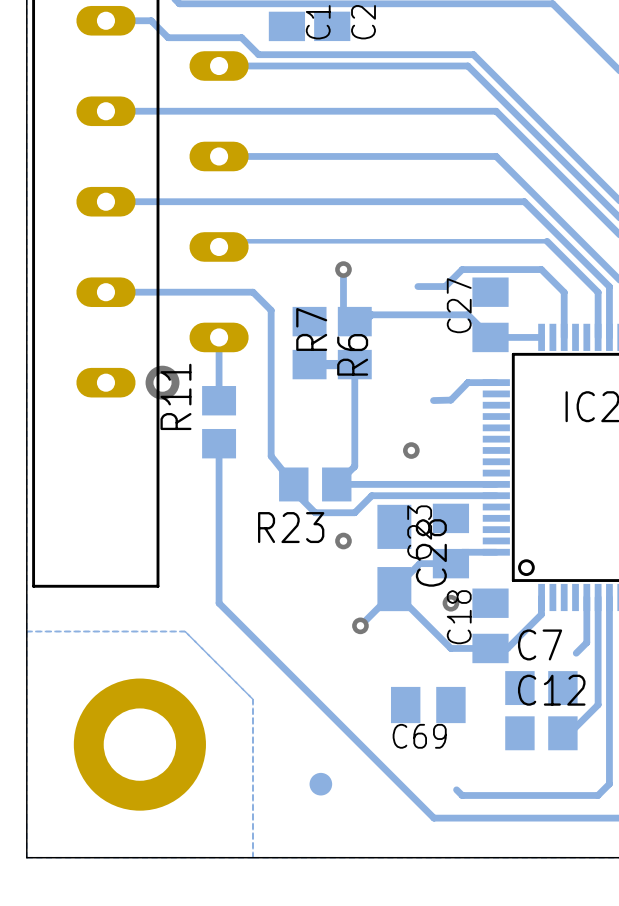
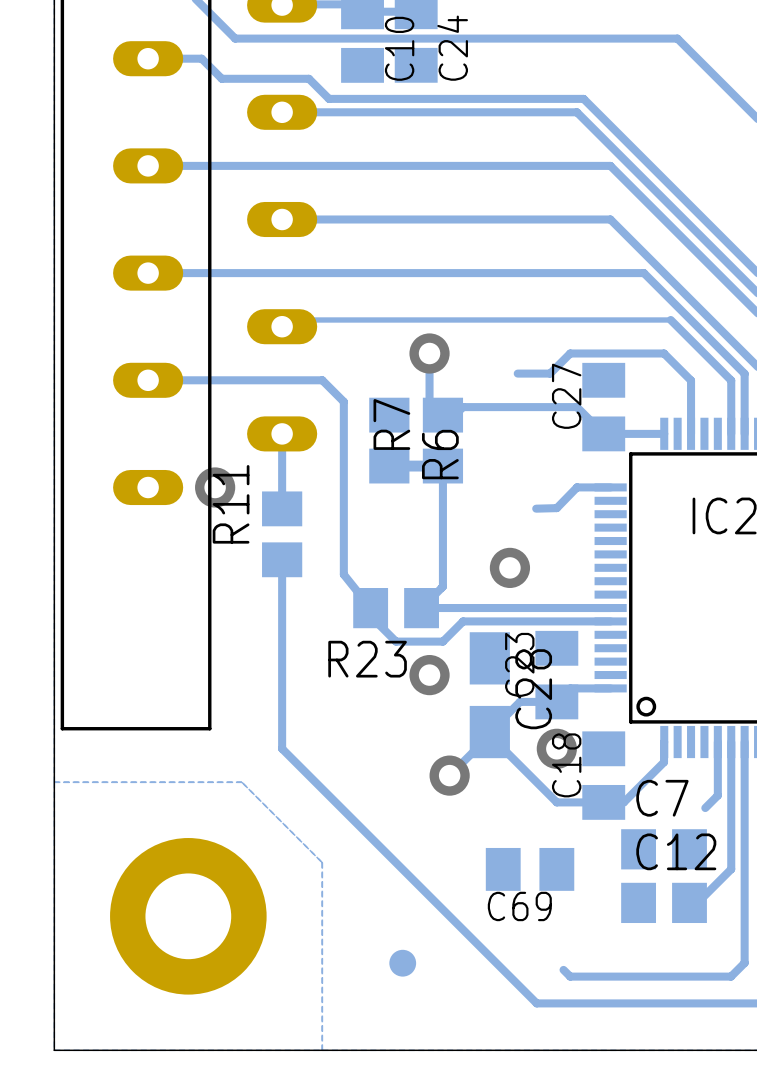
via size: [335, 261, 352, 278] -> [409, 333, 450, 374]
via size: [403, 442, 420, 459] -> [489, 547, 531, 589]
via size: [335, 532, 352, 550] -> [409, 655, 450, 696]
via size: [442, 594, 460, 612] -> [536, 728, 577, 769]
via size: [352, 617, 369, 635] -> [429, 755, 470, 796]

